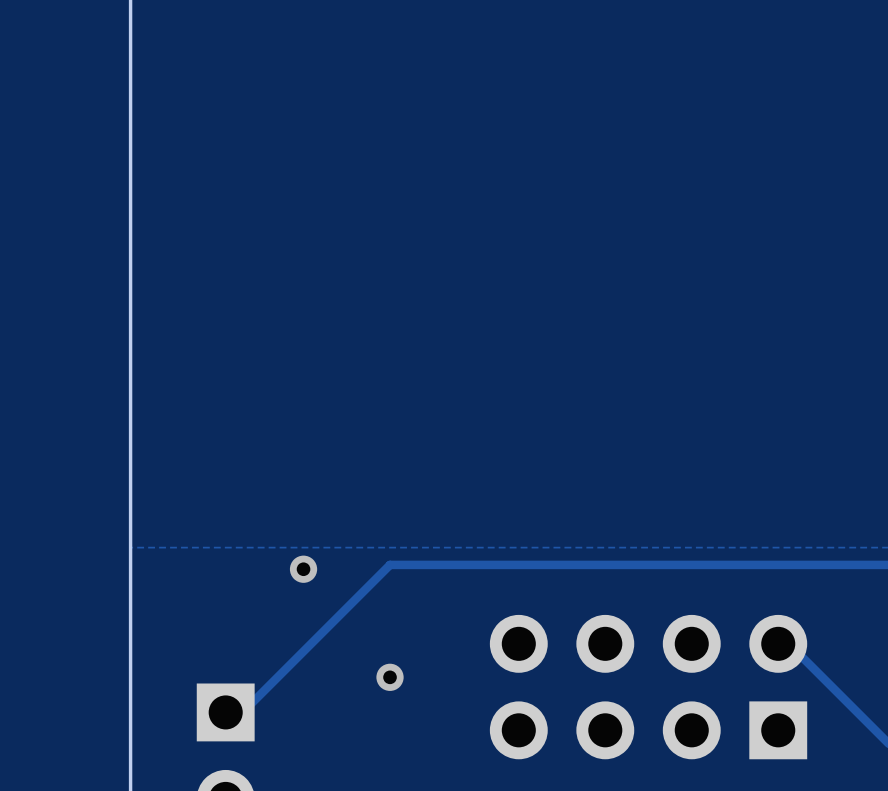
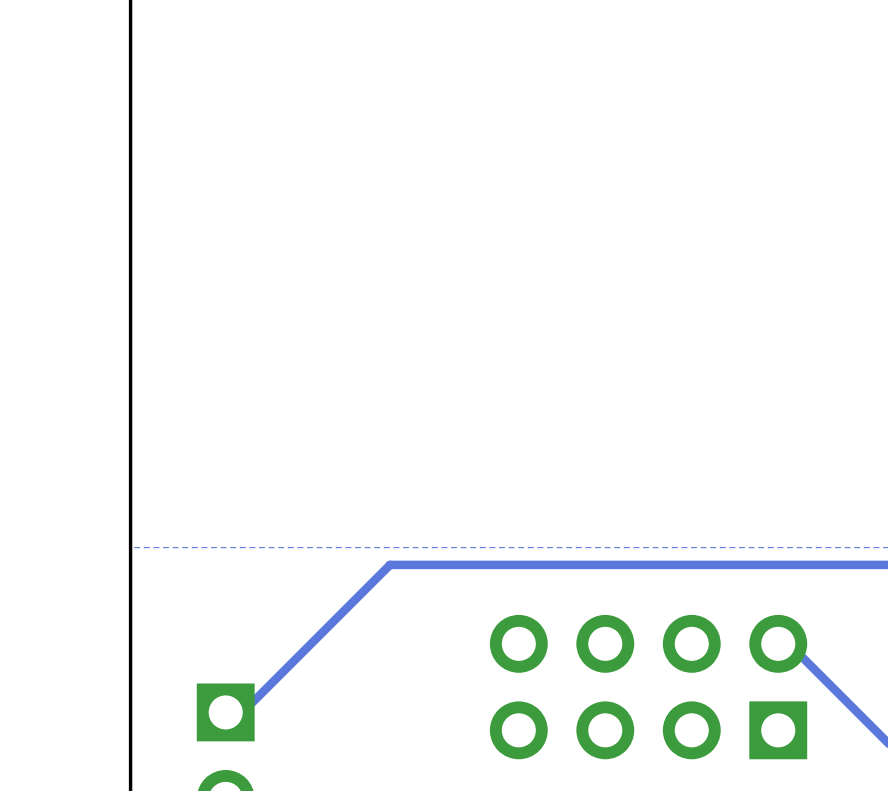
via: (303, 569) -> none
via: (390, 677) -> none

